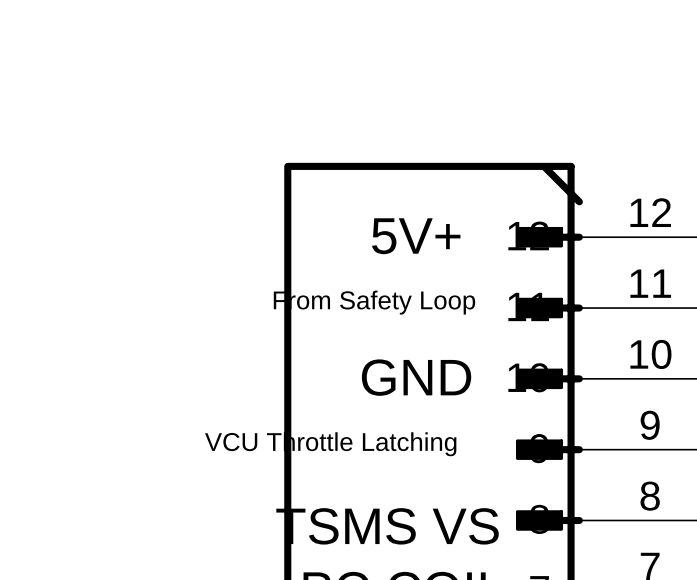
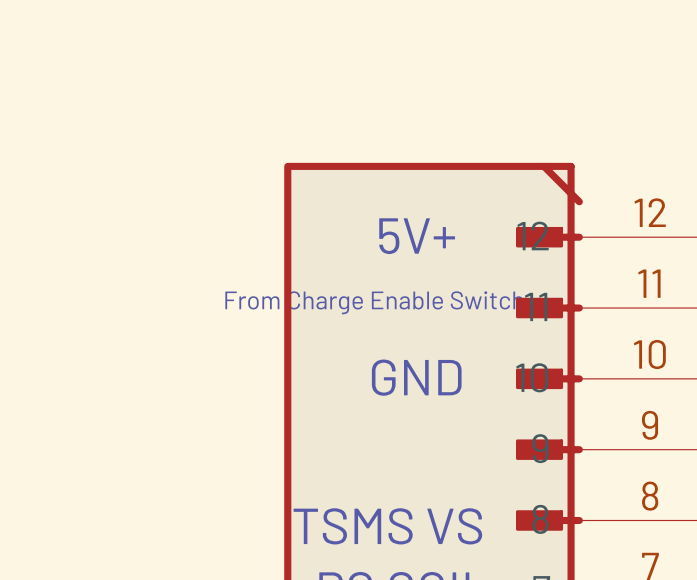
text: From Safety Loop (374, 302) -> From Charge Enable Switch (374, 302)
text: VCU Throttle Latching (330, 444) -> none

